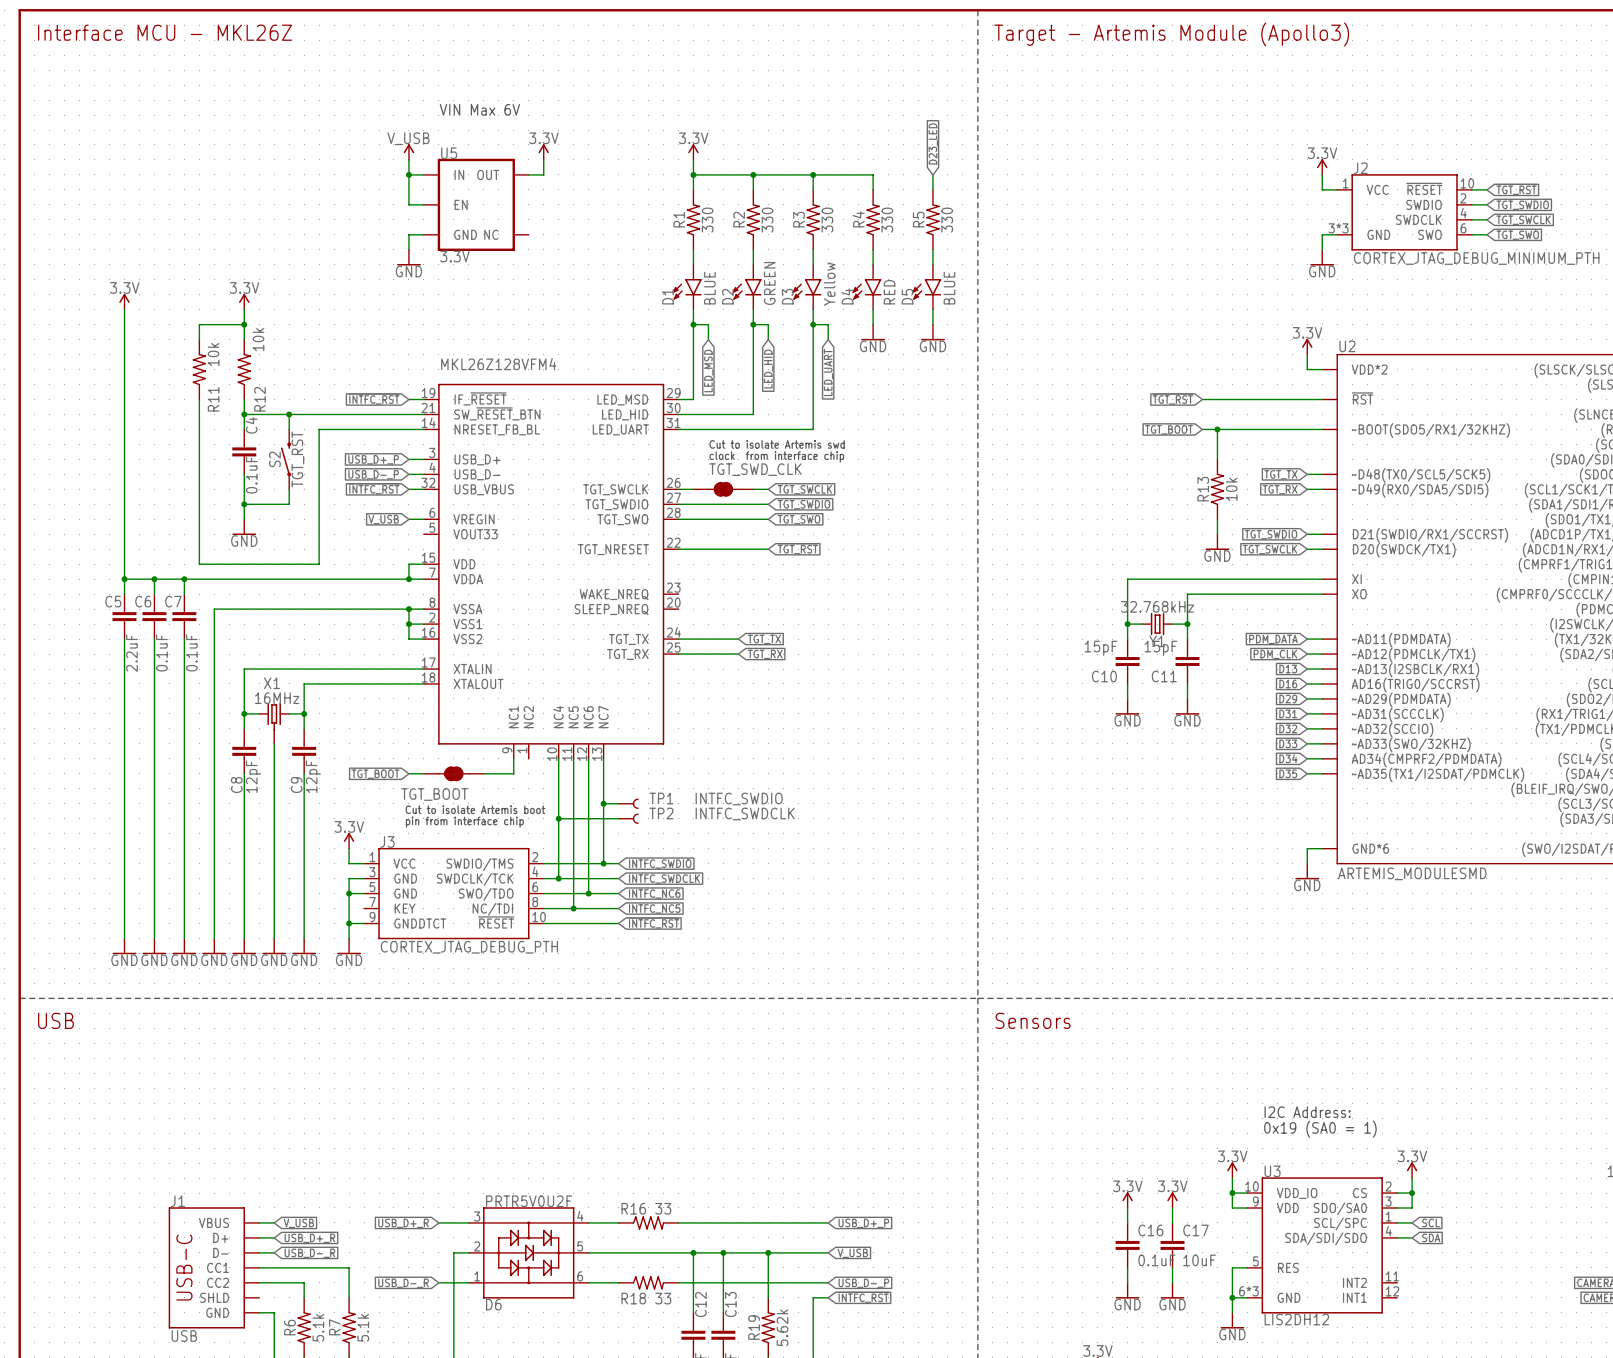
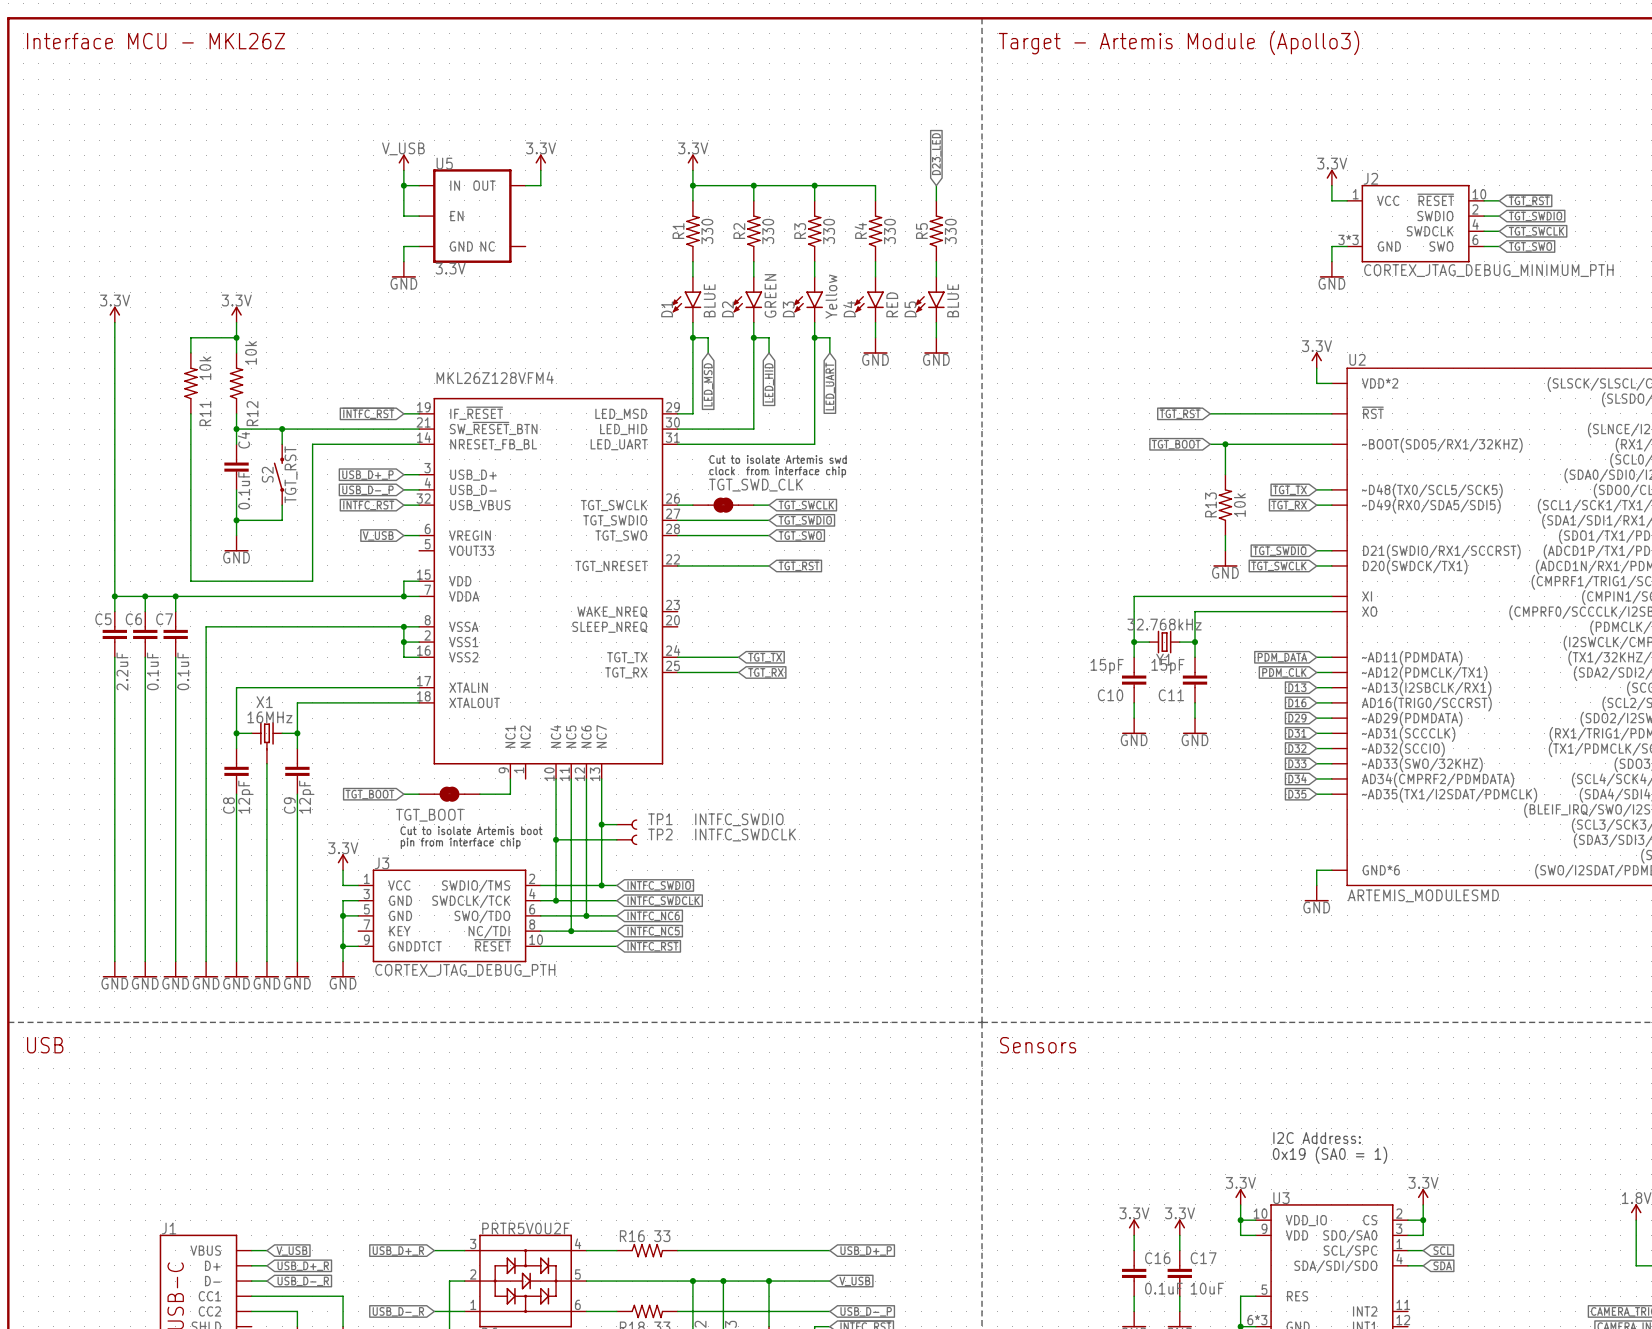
text: VIN Max 6V (479, 109) -> none

